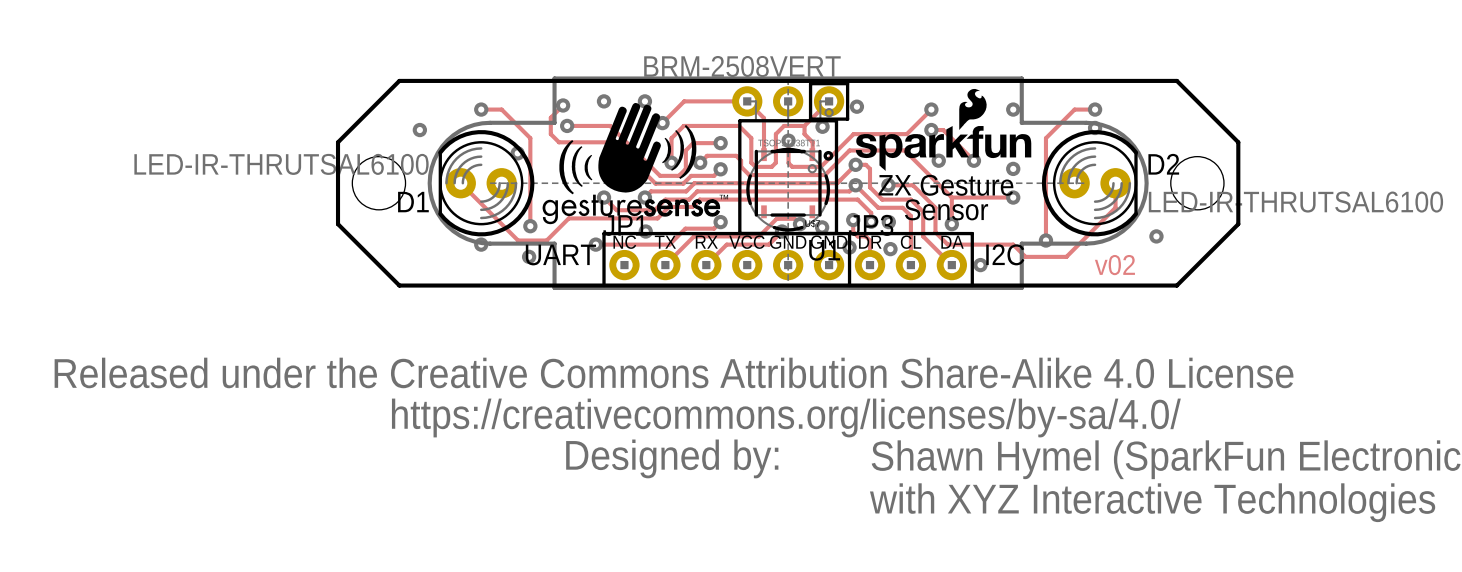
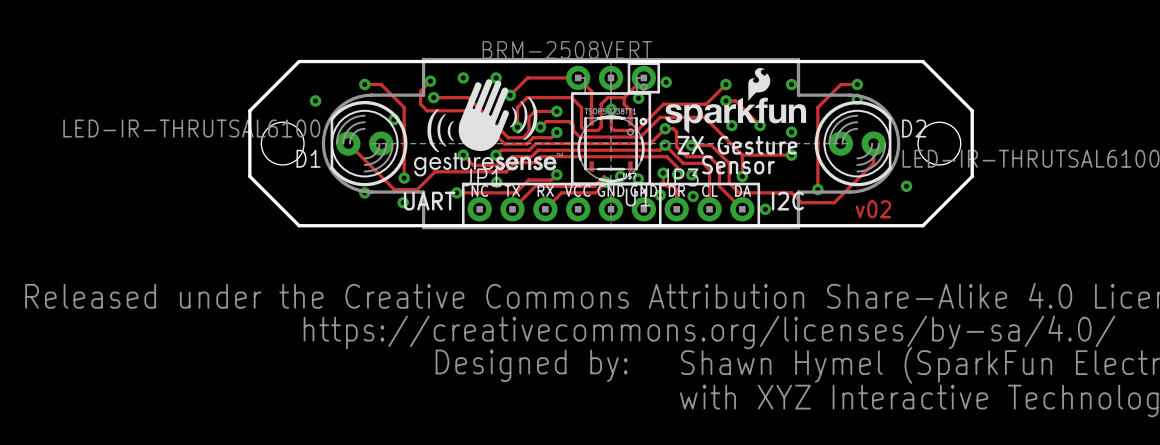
track: (800, 224) (794, 218) (776, 218) (759, 236) -> (604, 176) (594, 186) (587, 186)

